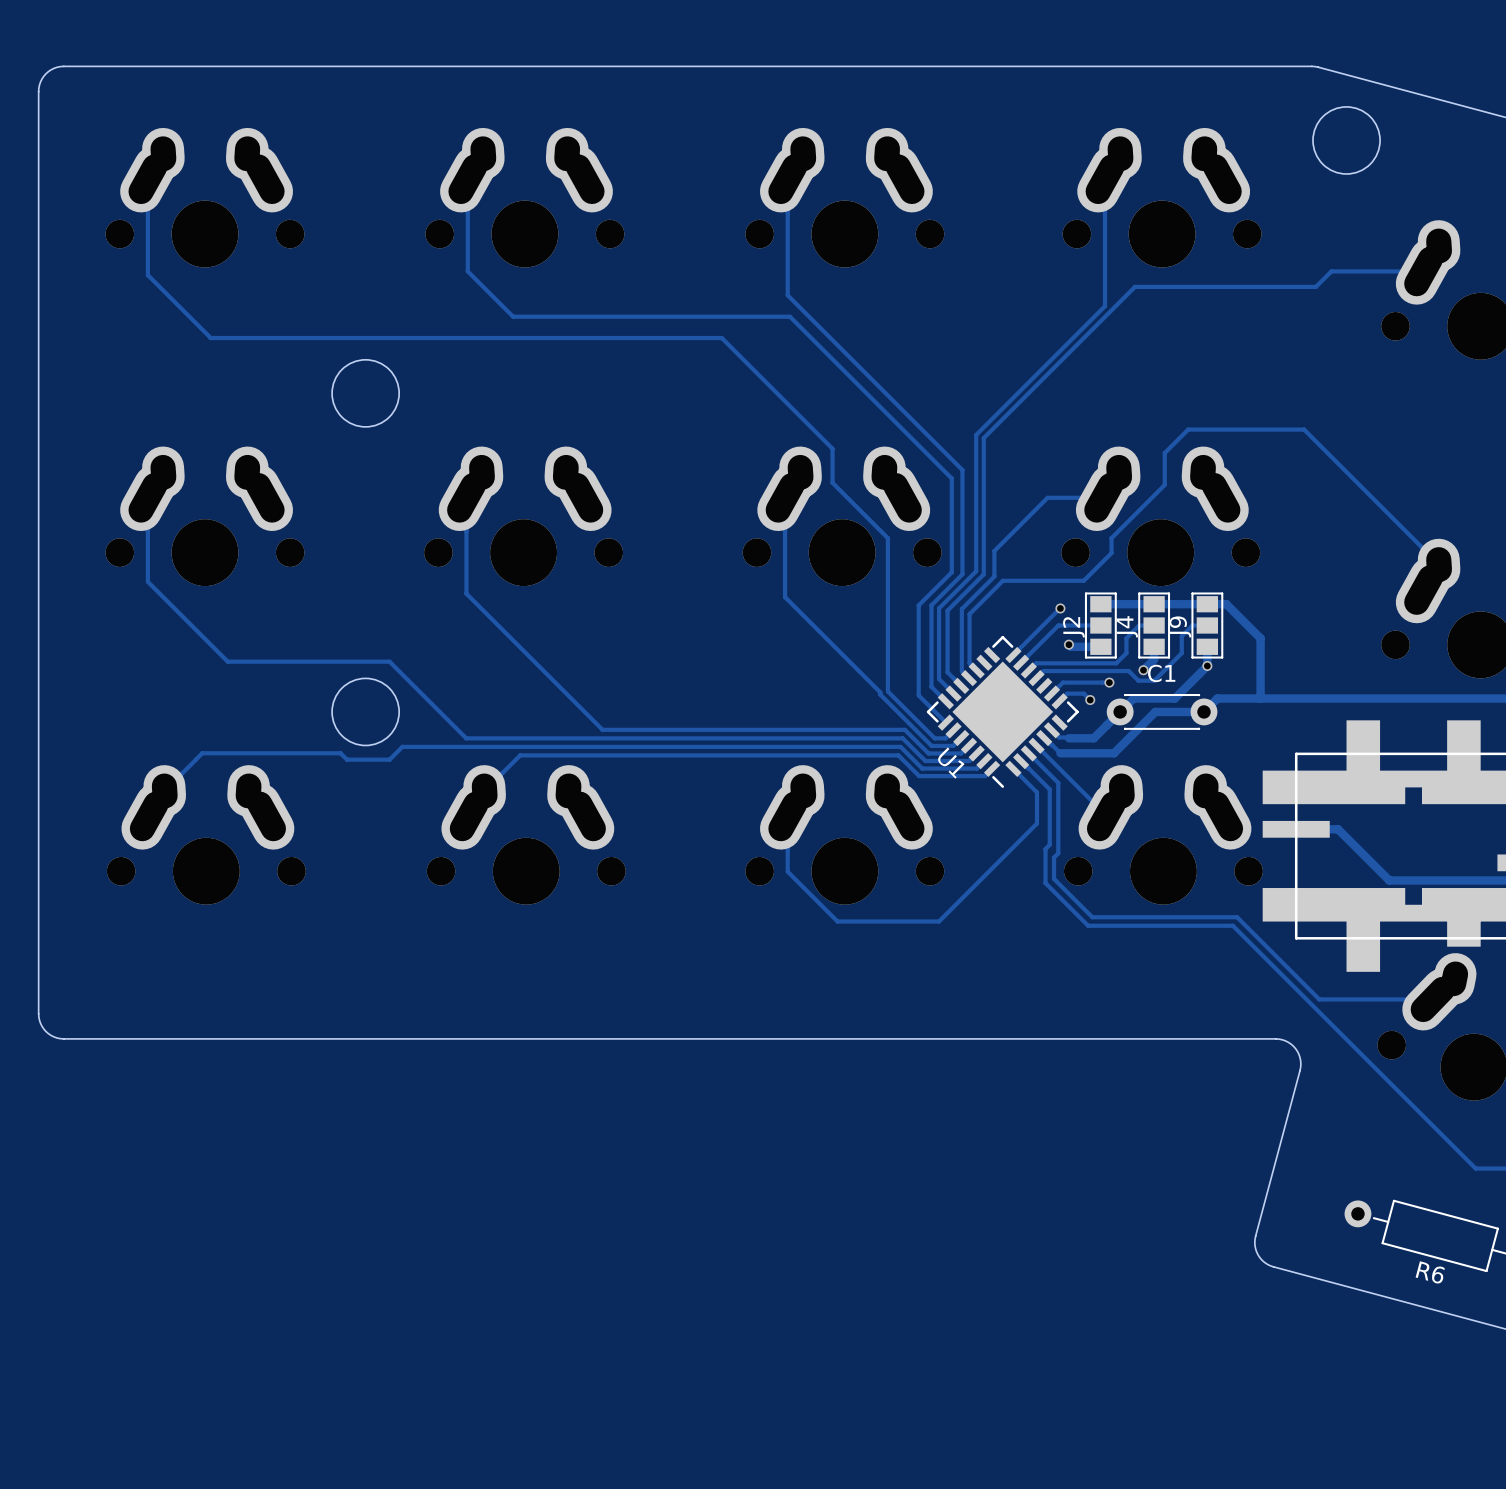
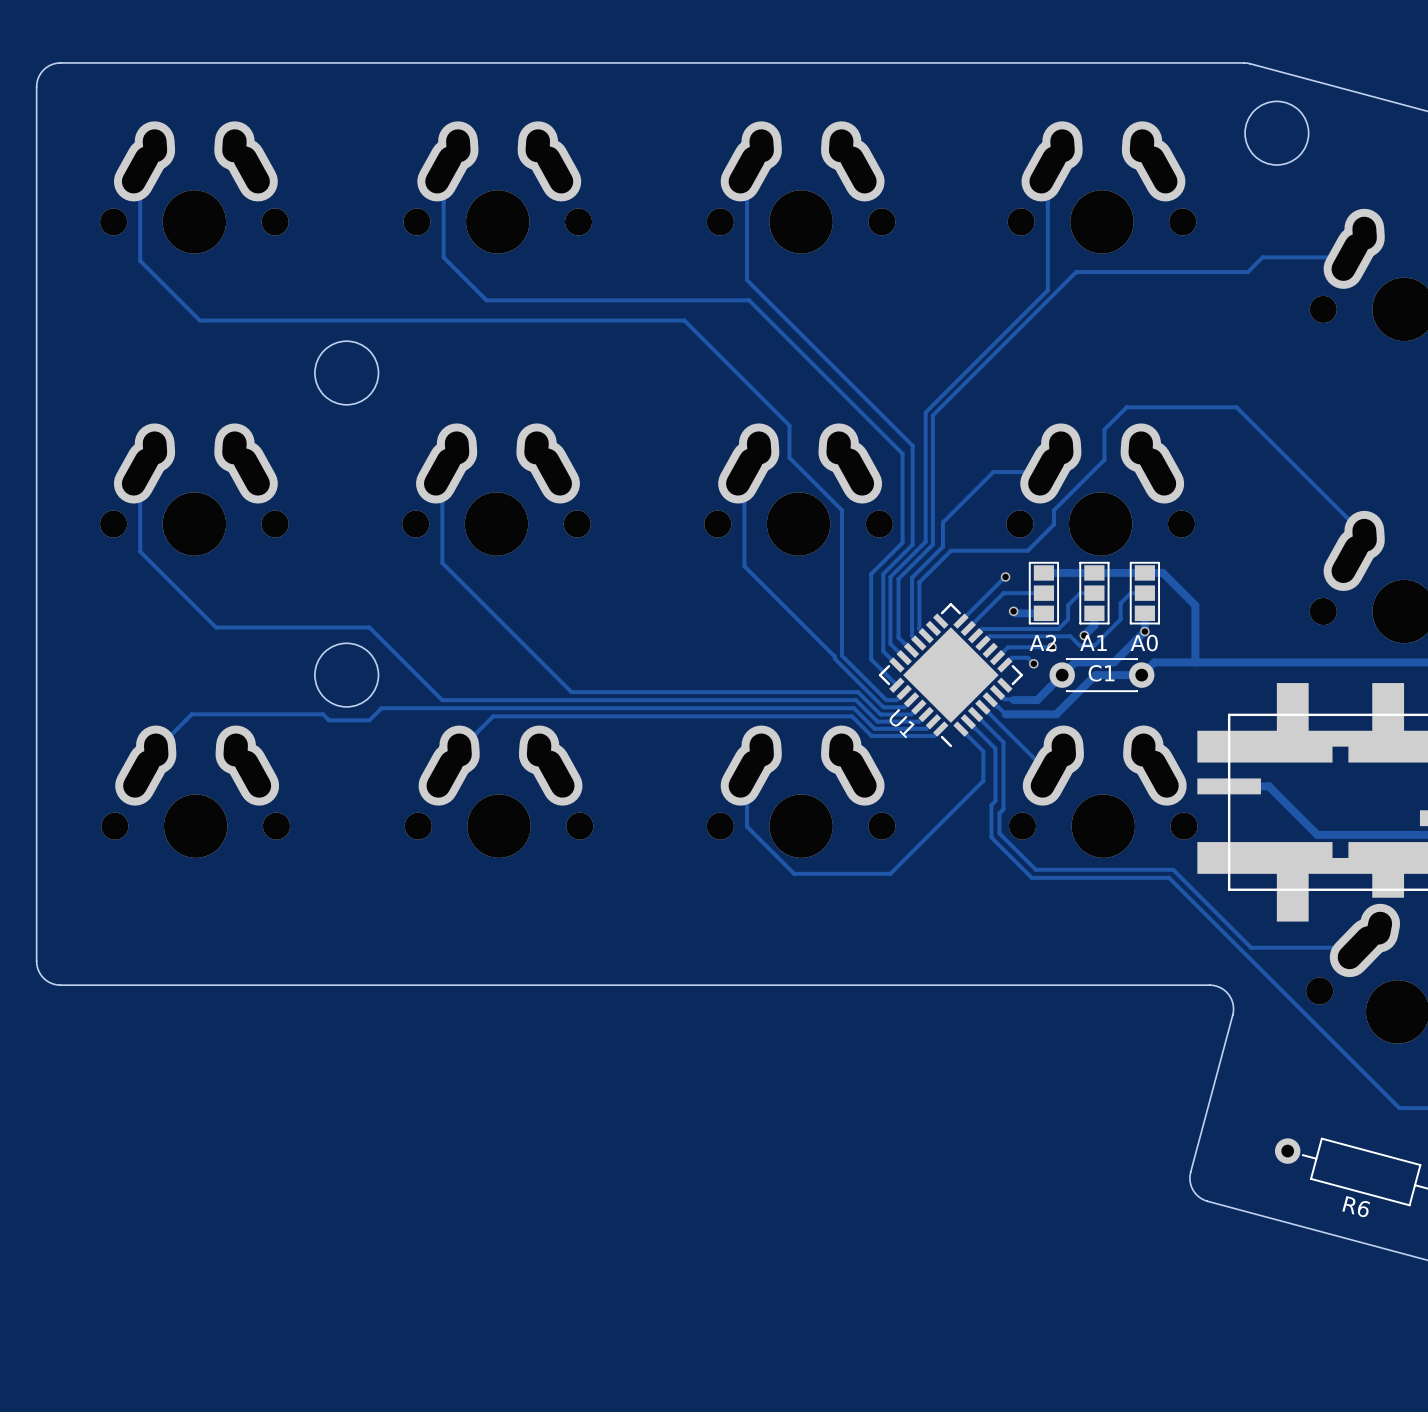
J4 name: J4 (1127, 626) -> A1 (1093, 643)
J9 name: J9 (1180, 626) -> A0 (1144, 643)
J2 name: J2 (1073, 627) -> A2 (1042, 642)
C1 name position: C1 (1161, 673) -> C1 (1101, 673)

